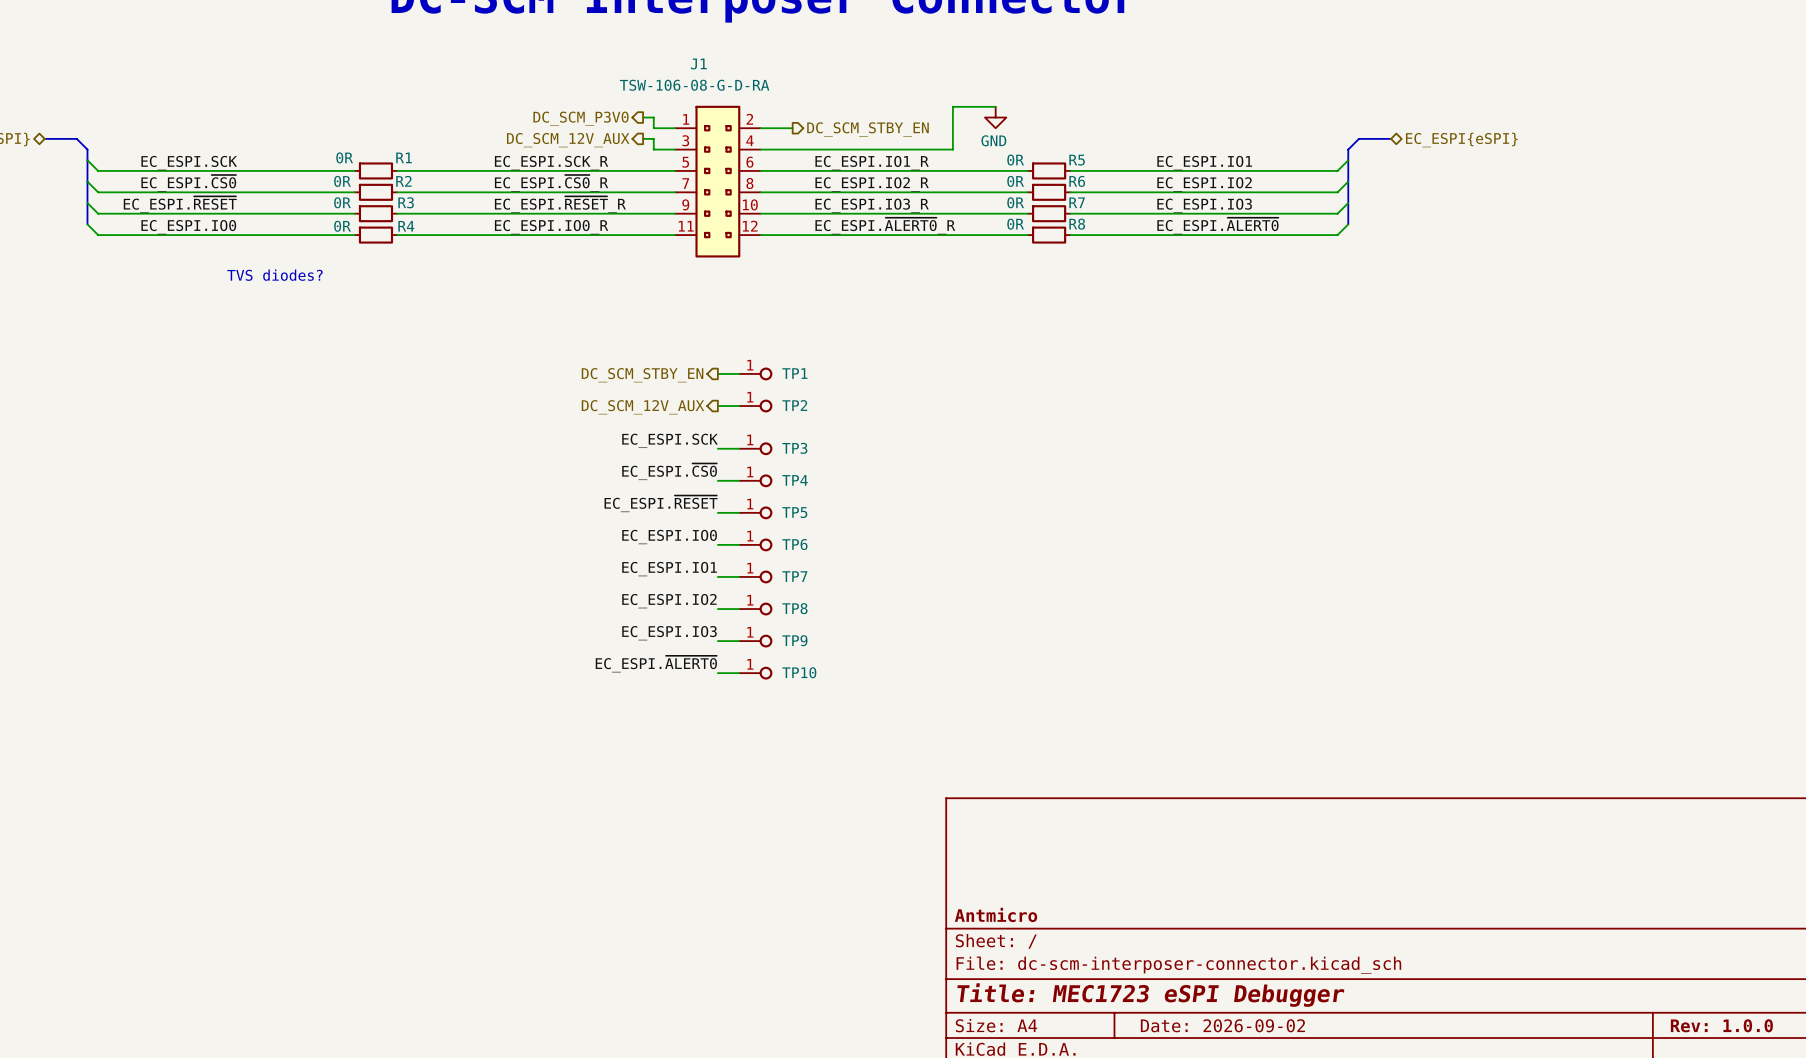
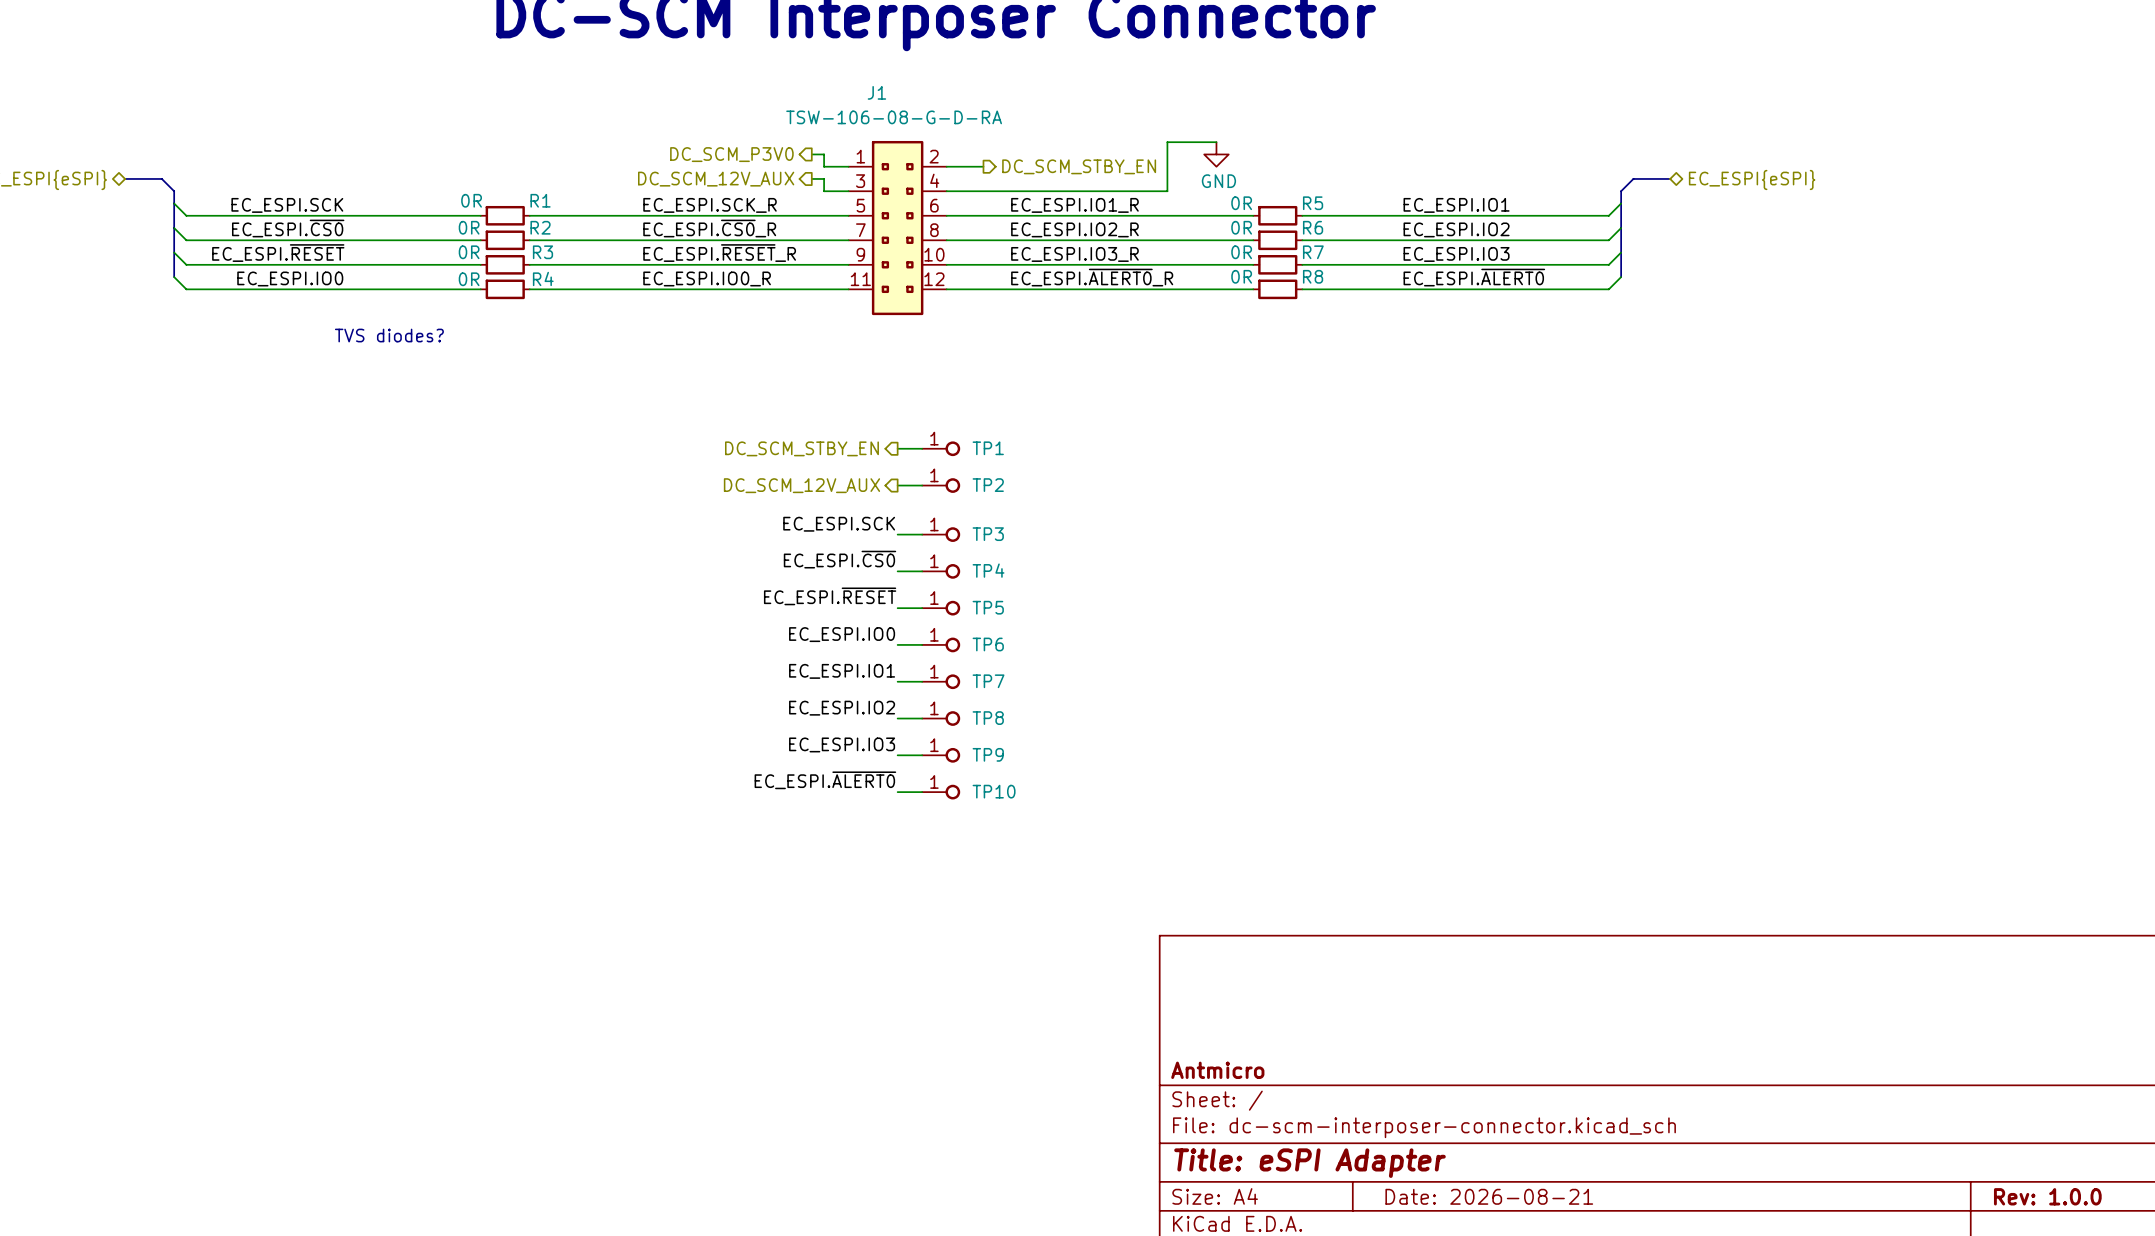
title block: Title: MEC1723 eSPI Debugger (1150, 995) -> Title: eSPI Adapter (1309, 1163)
title block: Date: 2026-09-02 (1222, 1025) -> Date: 2026-08-21 (1489, 1196)

